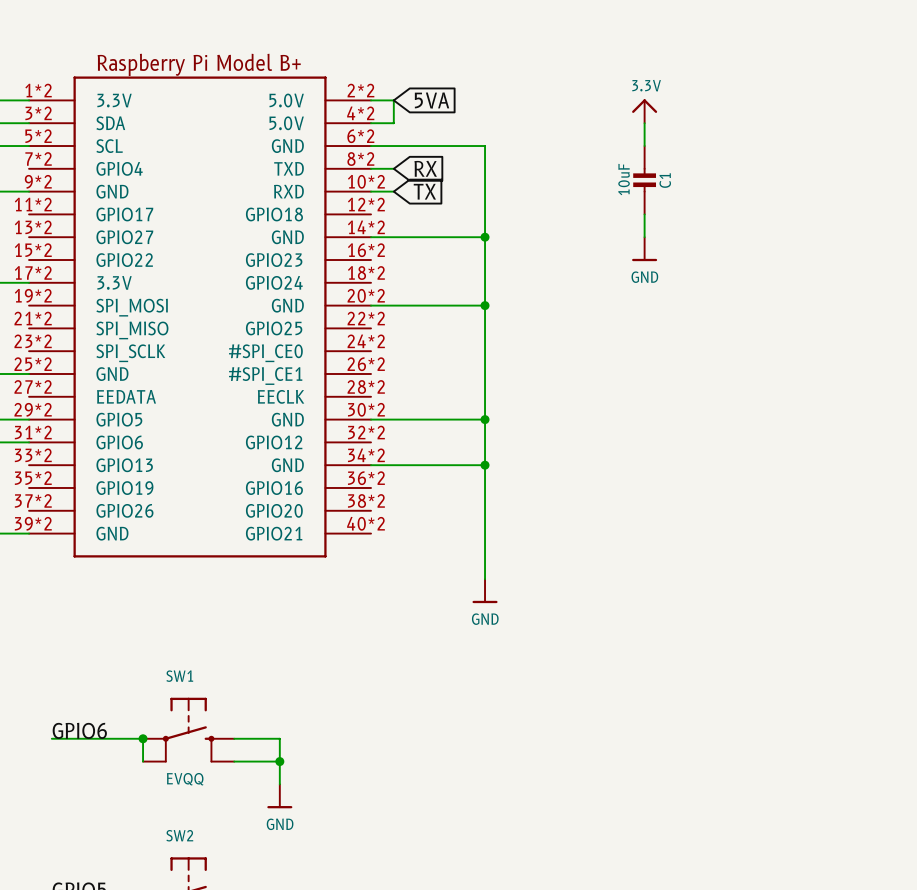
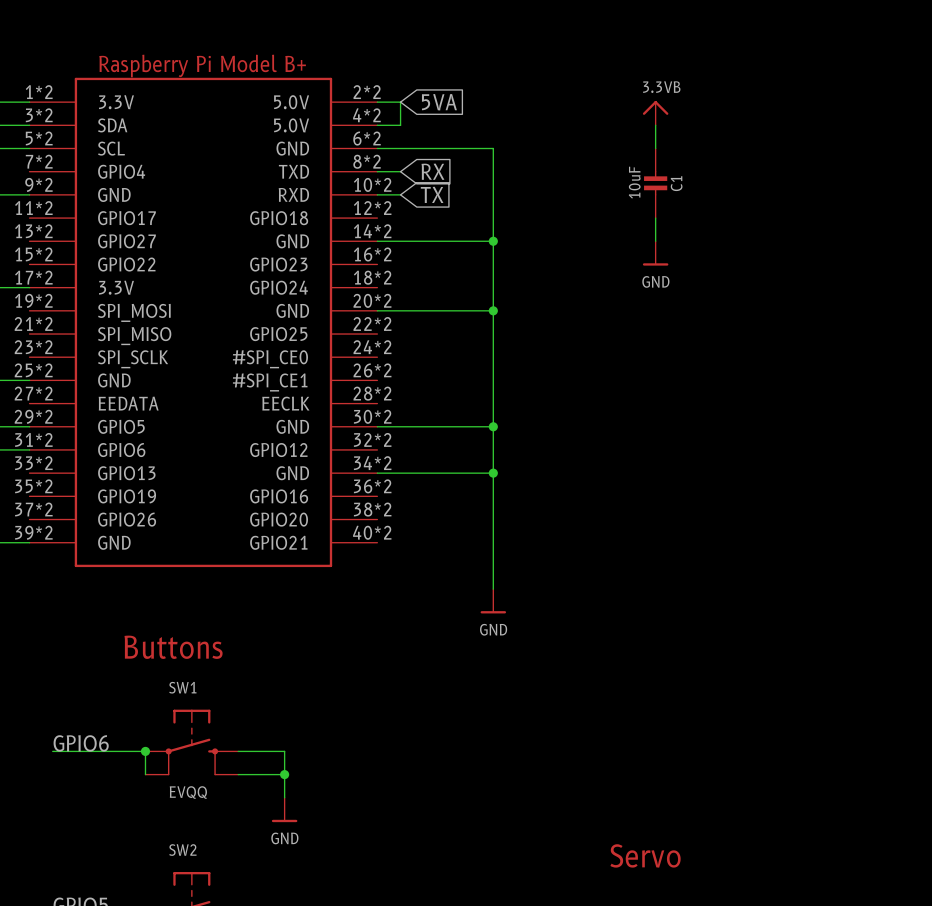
power symbol: 3.3V (644, 111) -> 3.3VB (655, 113)
text: none -> Buttons (173, 647)
text: none -> Servo (645, 855)

